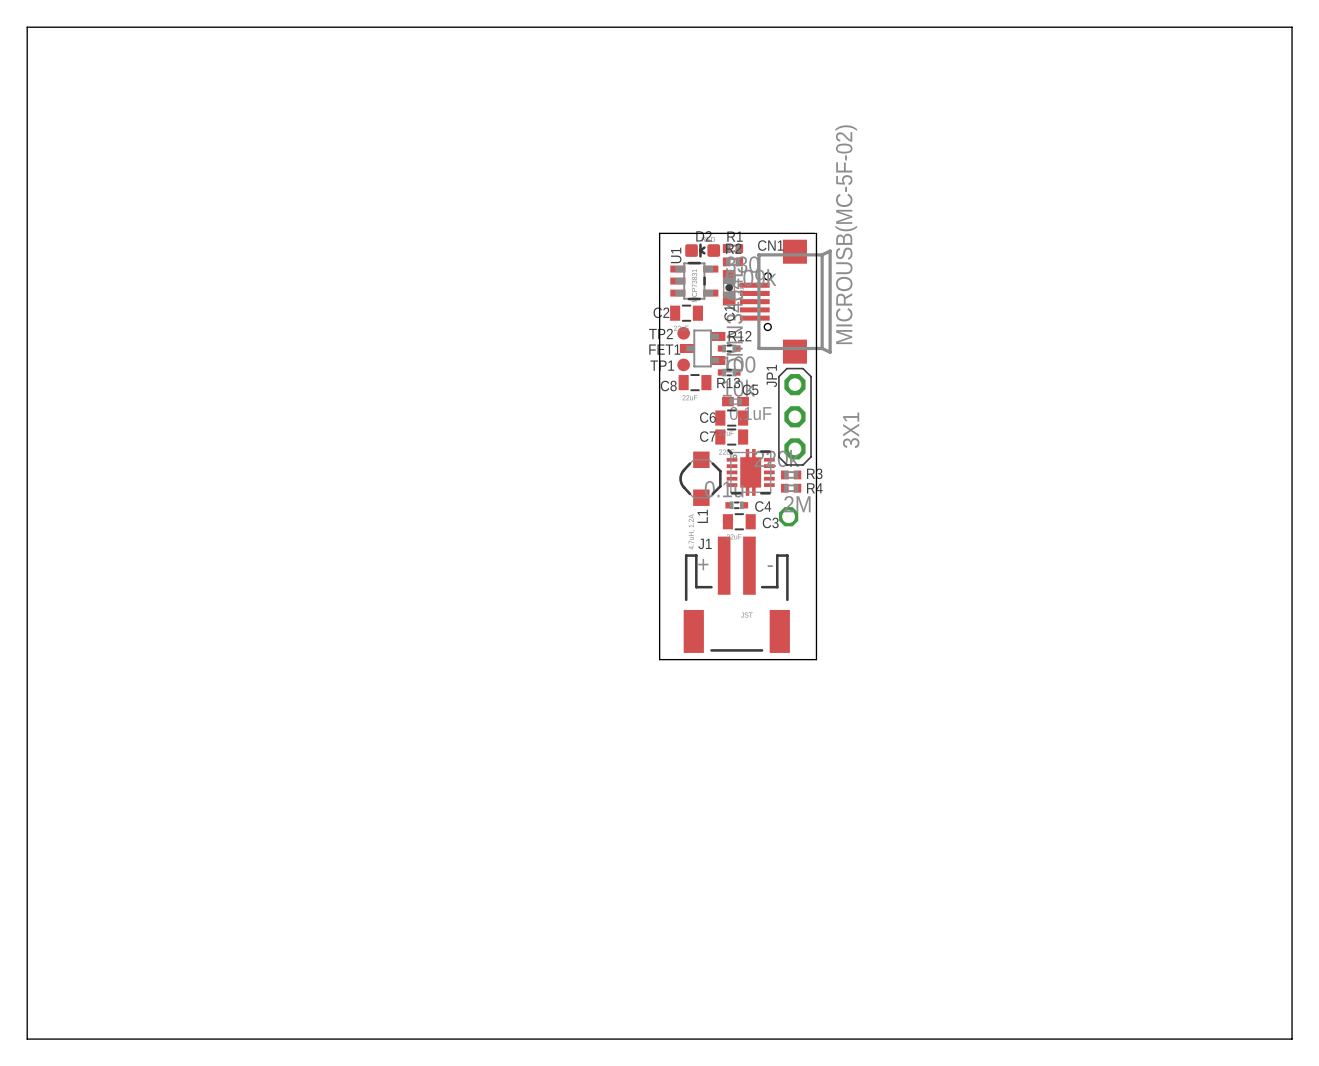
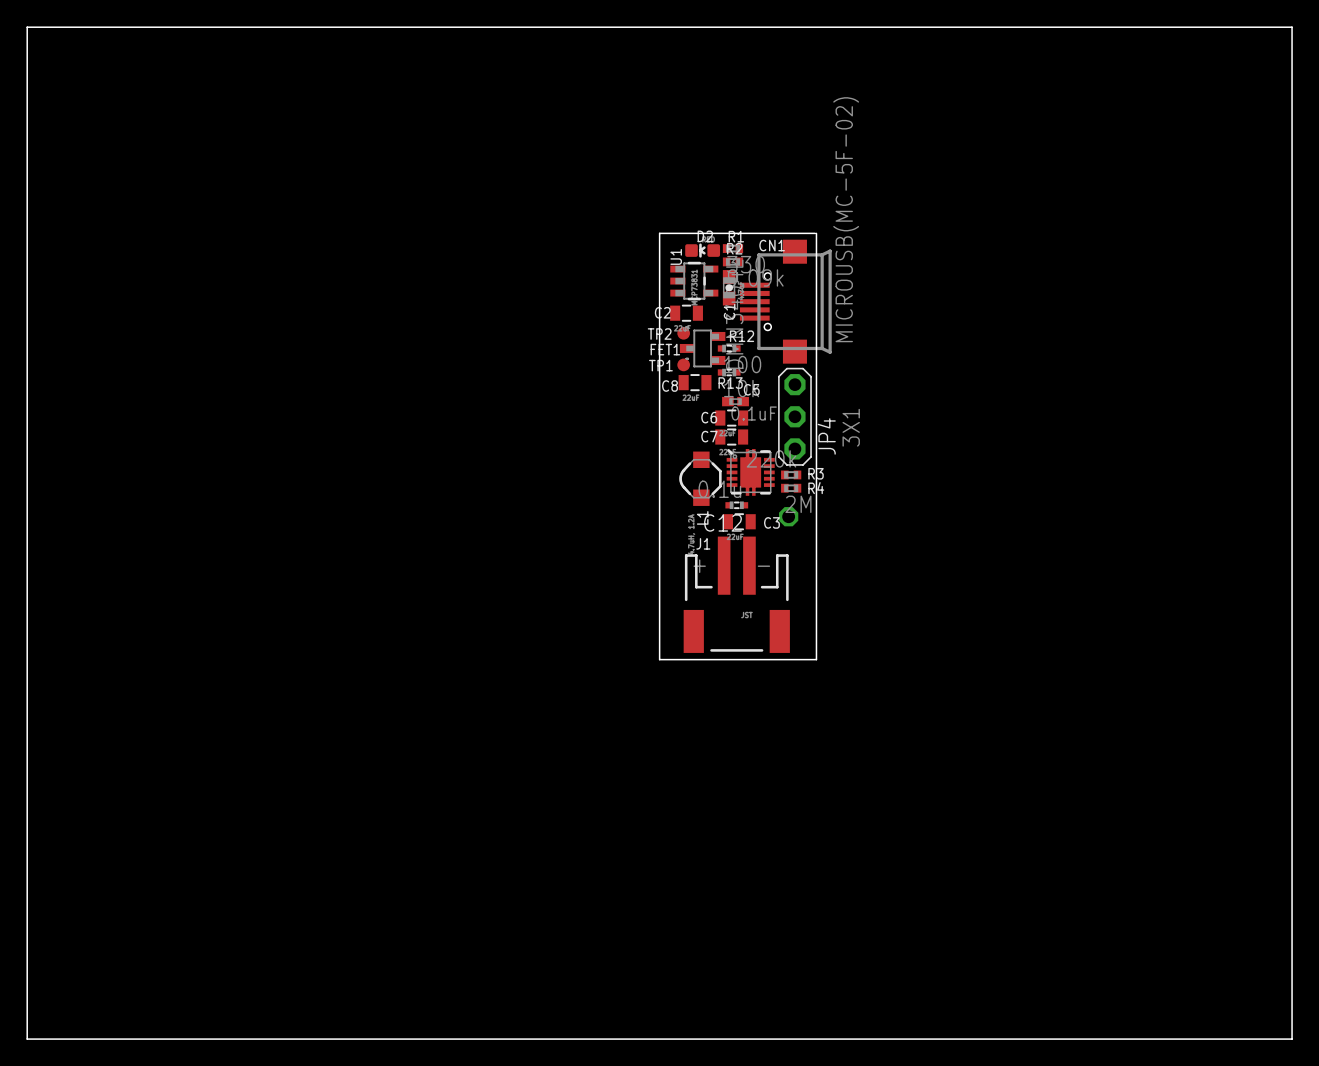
JP1 name: JP1 (771, 376) -> JP4 (826, 436)
C4 name: C4 (763, 506) -> C12 (722, 522)

